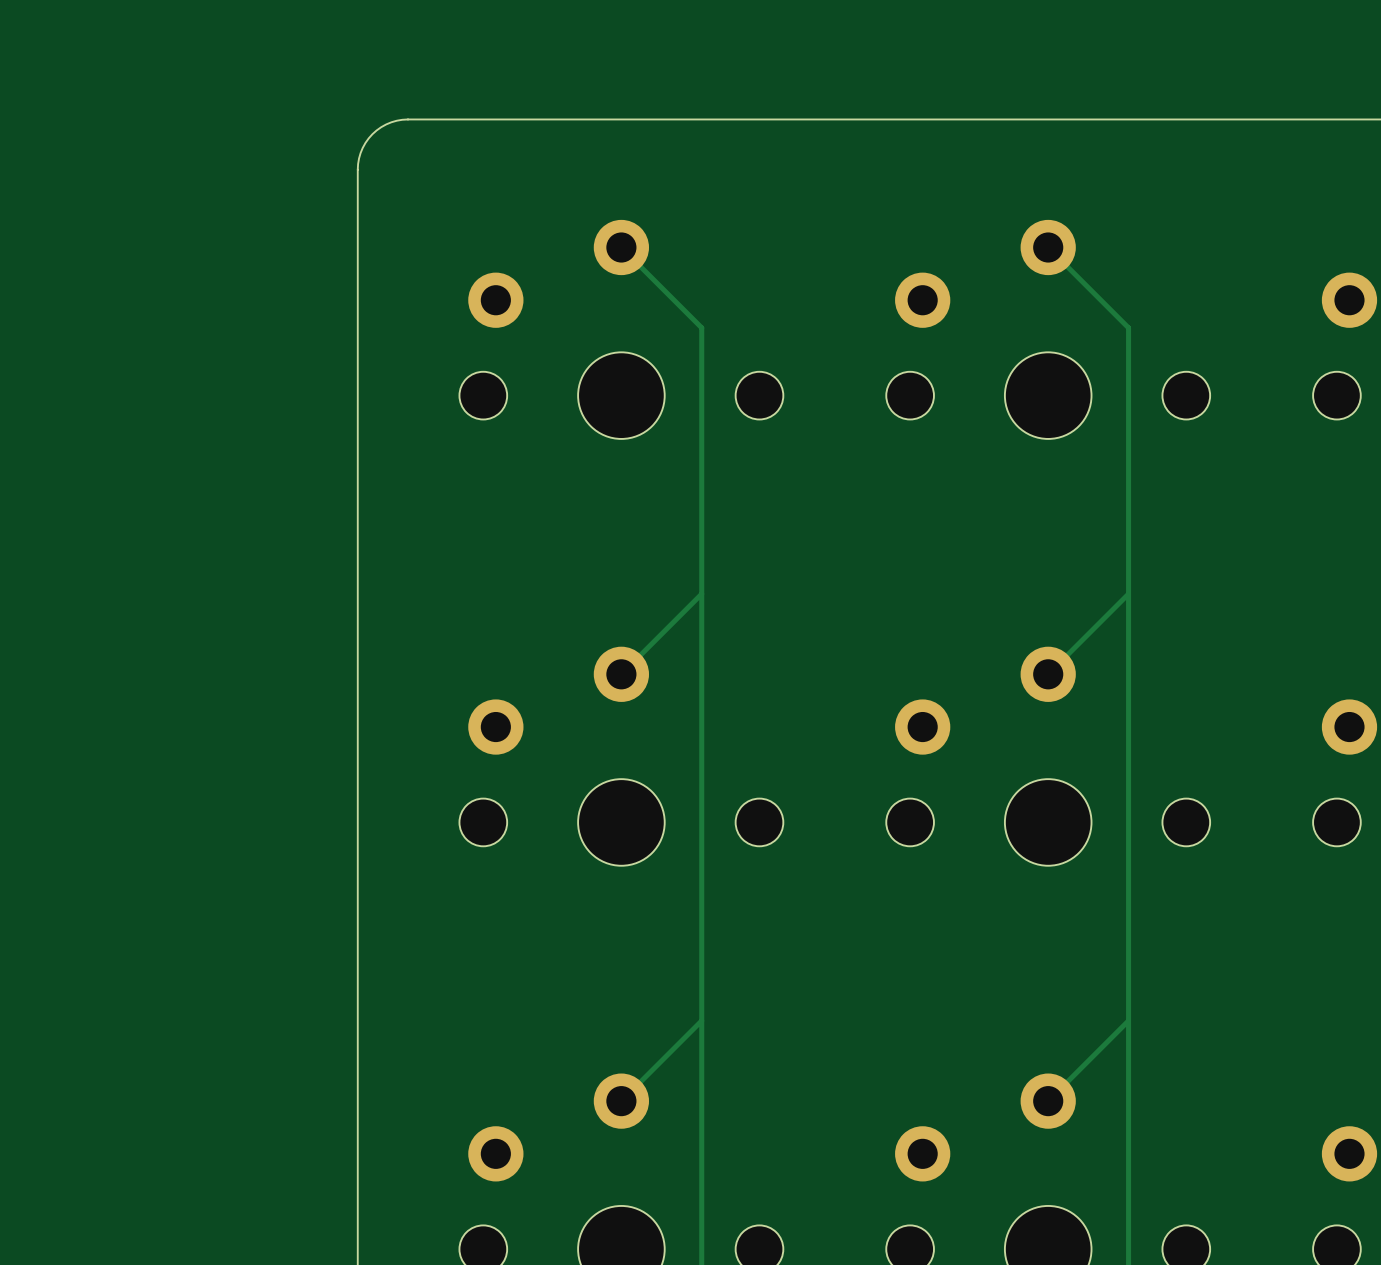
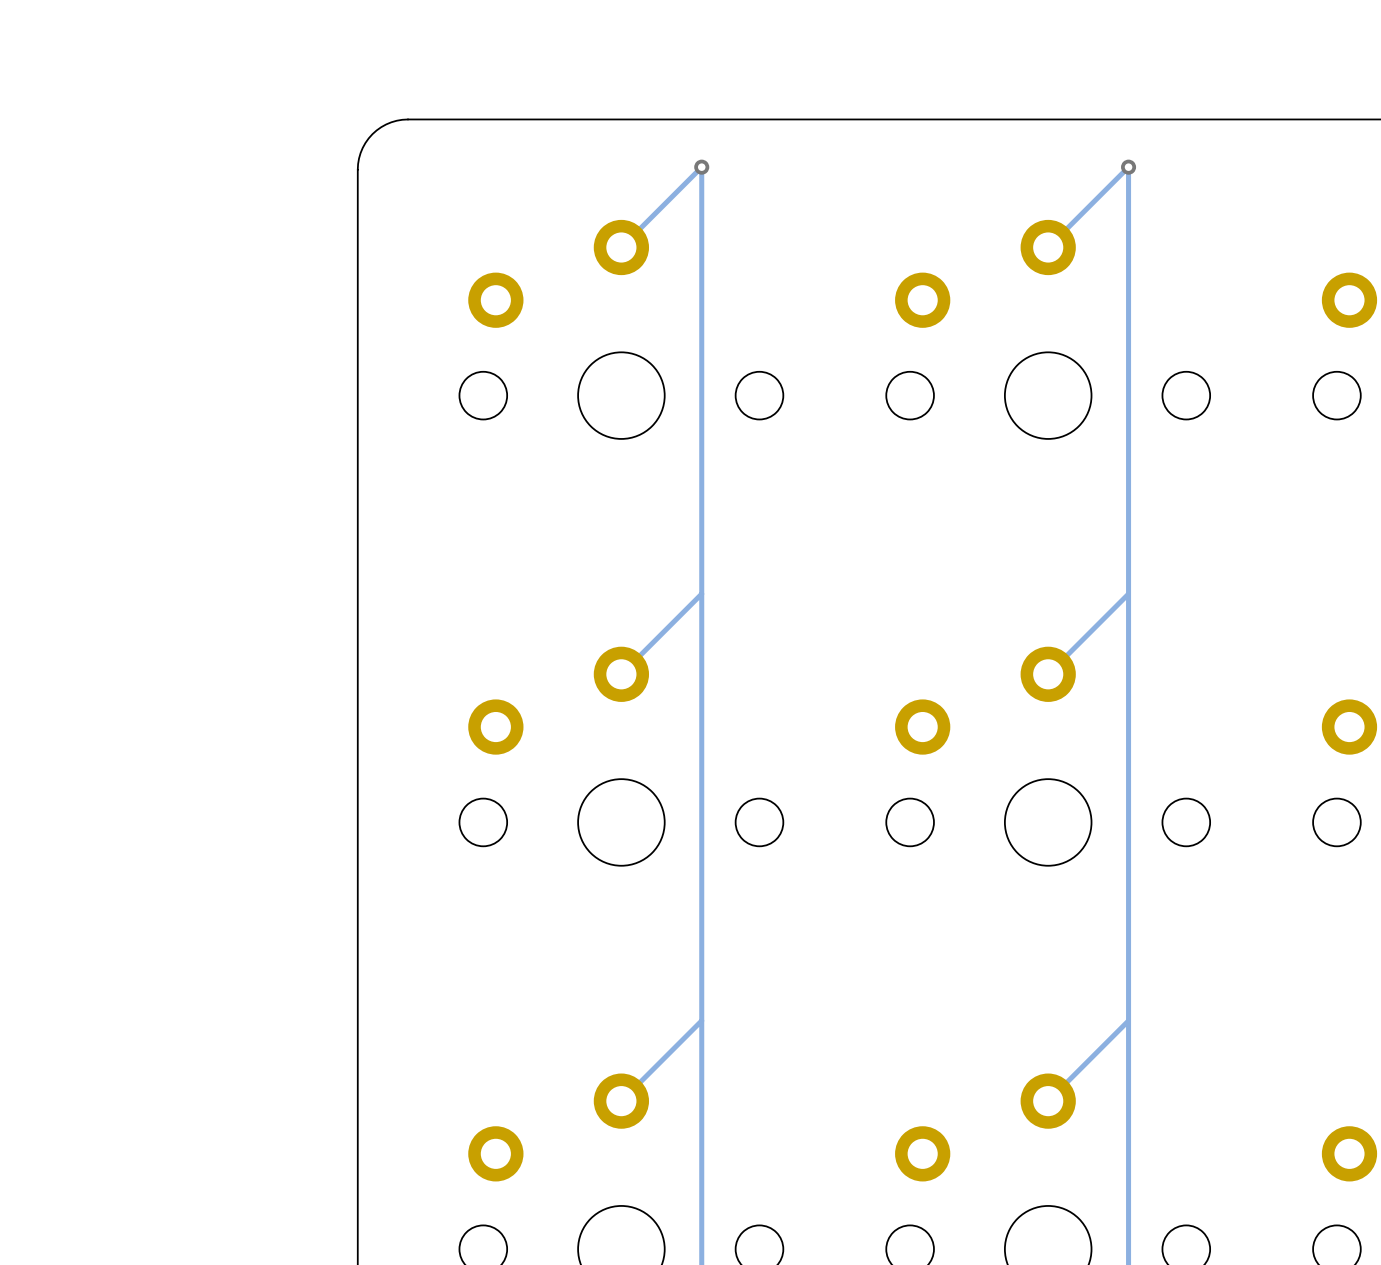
via: none -> (701, 167)
via: none -> (1128, 167)
track: (621, 247) (701, 327) -> (621, 247) (701, 167) (701, 327)
track: (1048, 247) (1128, 327) -> (1048, 247) (1128, 167) (1128, 327)

